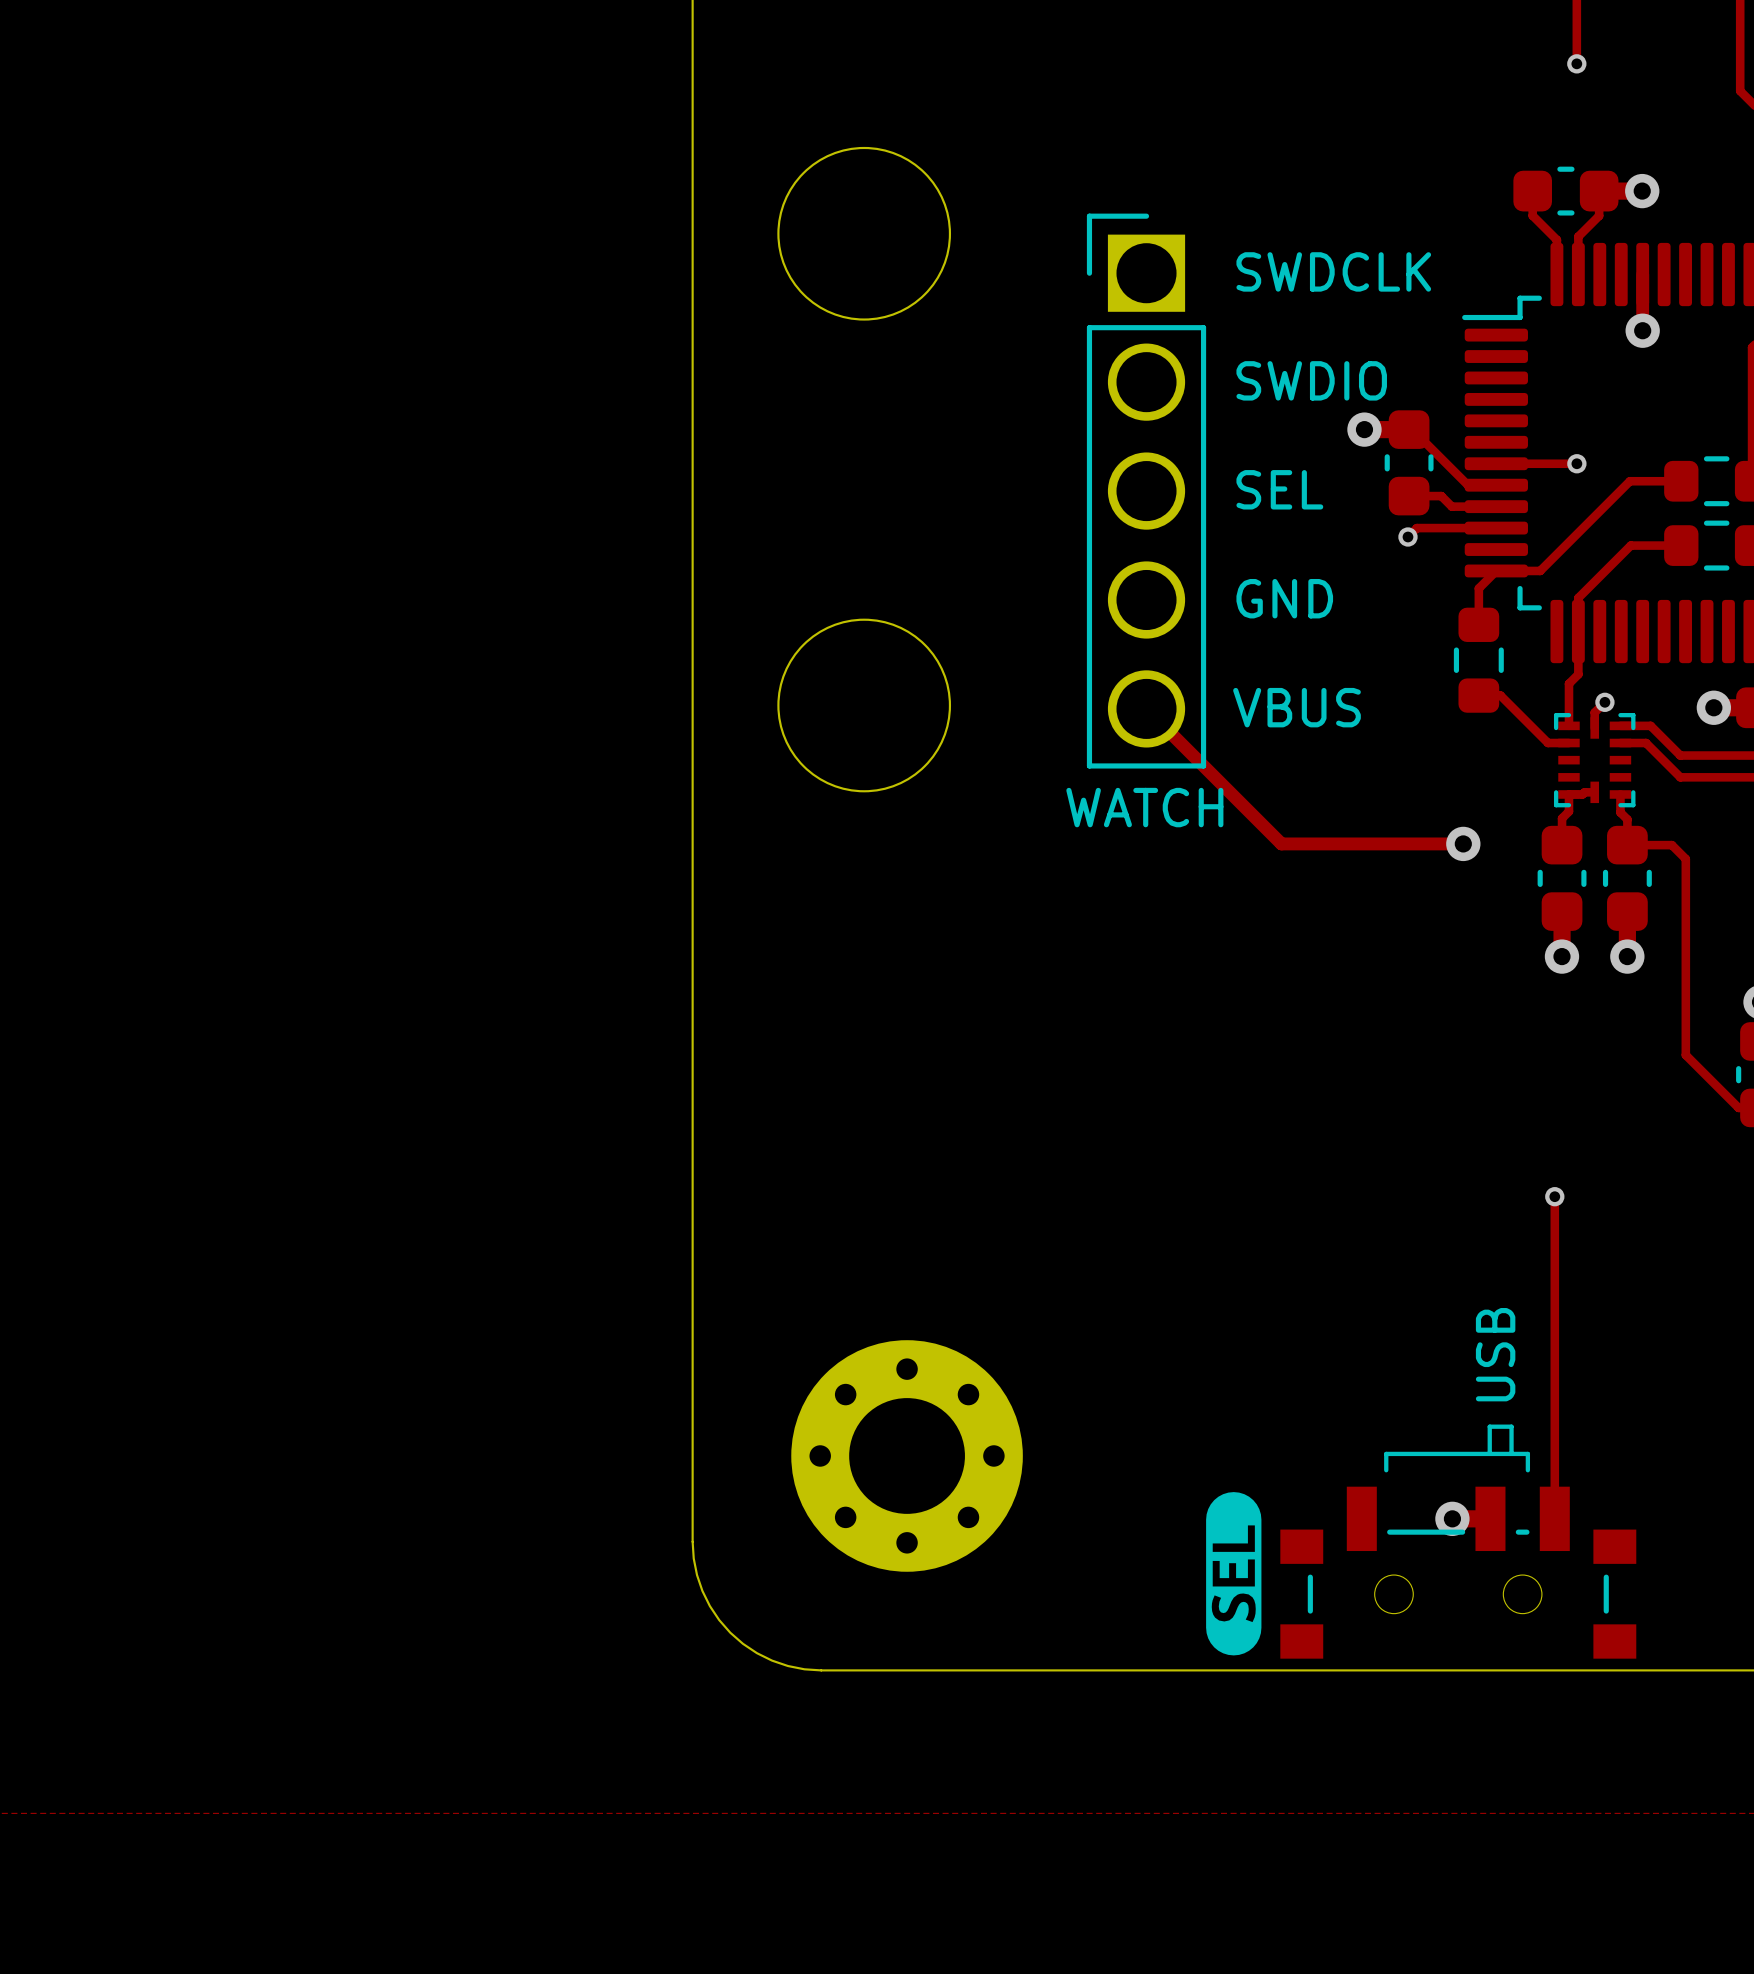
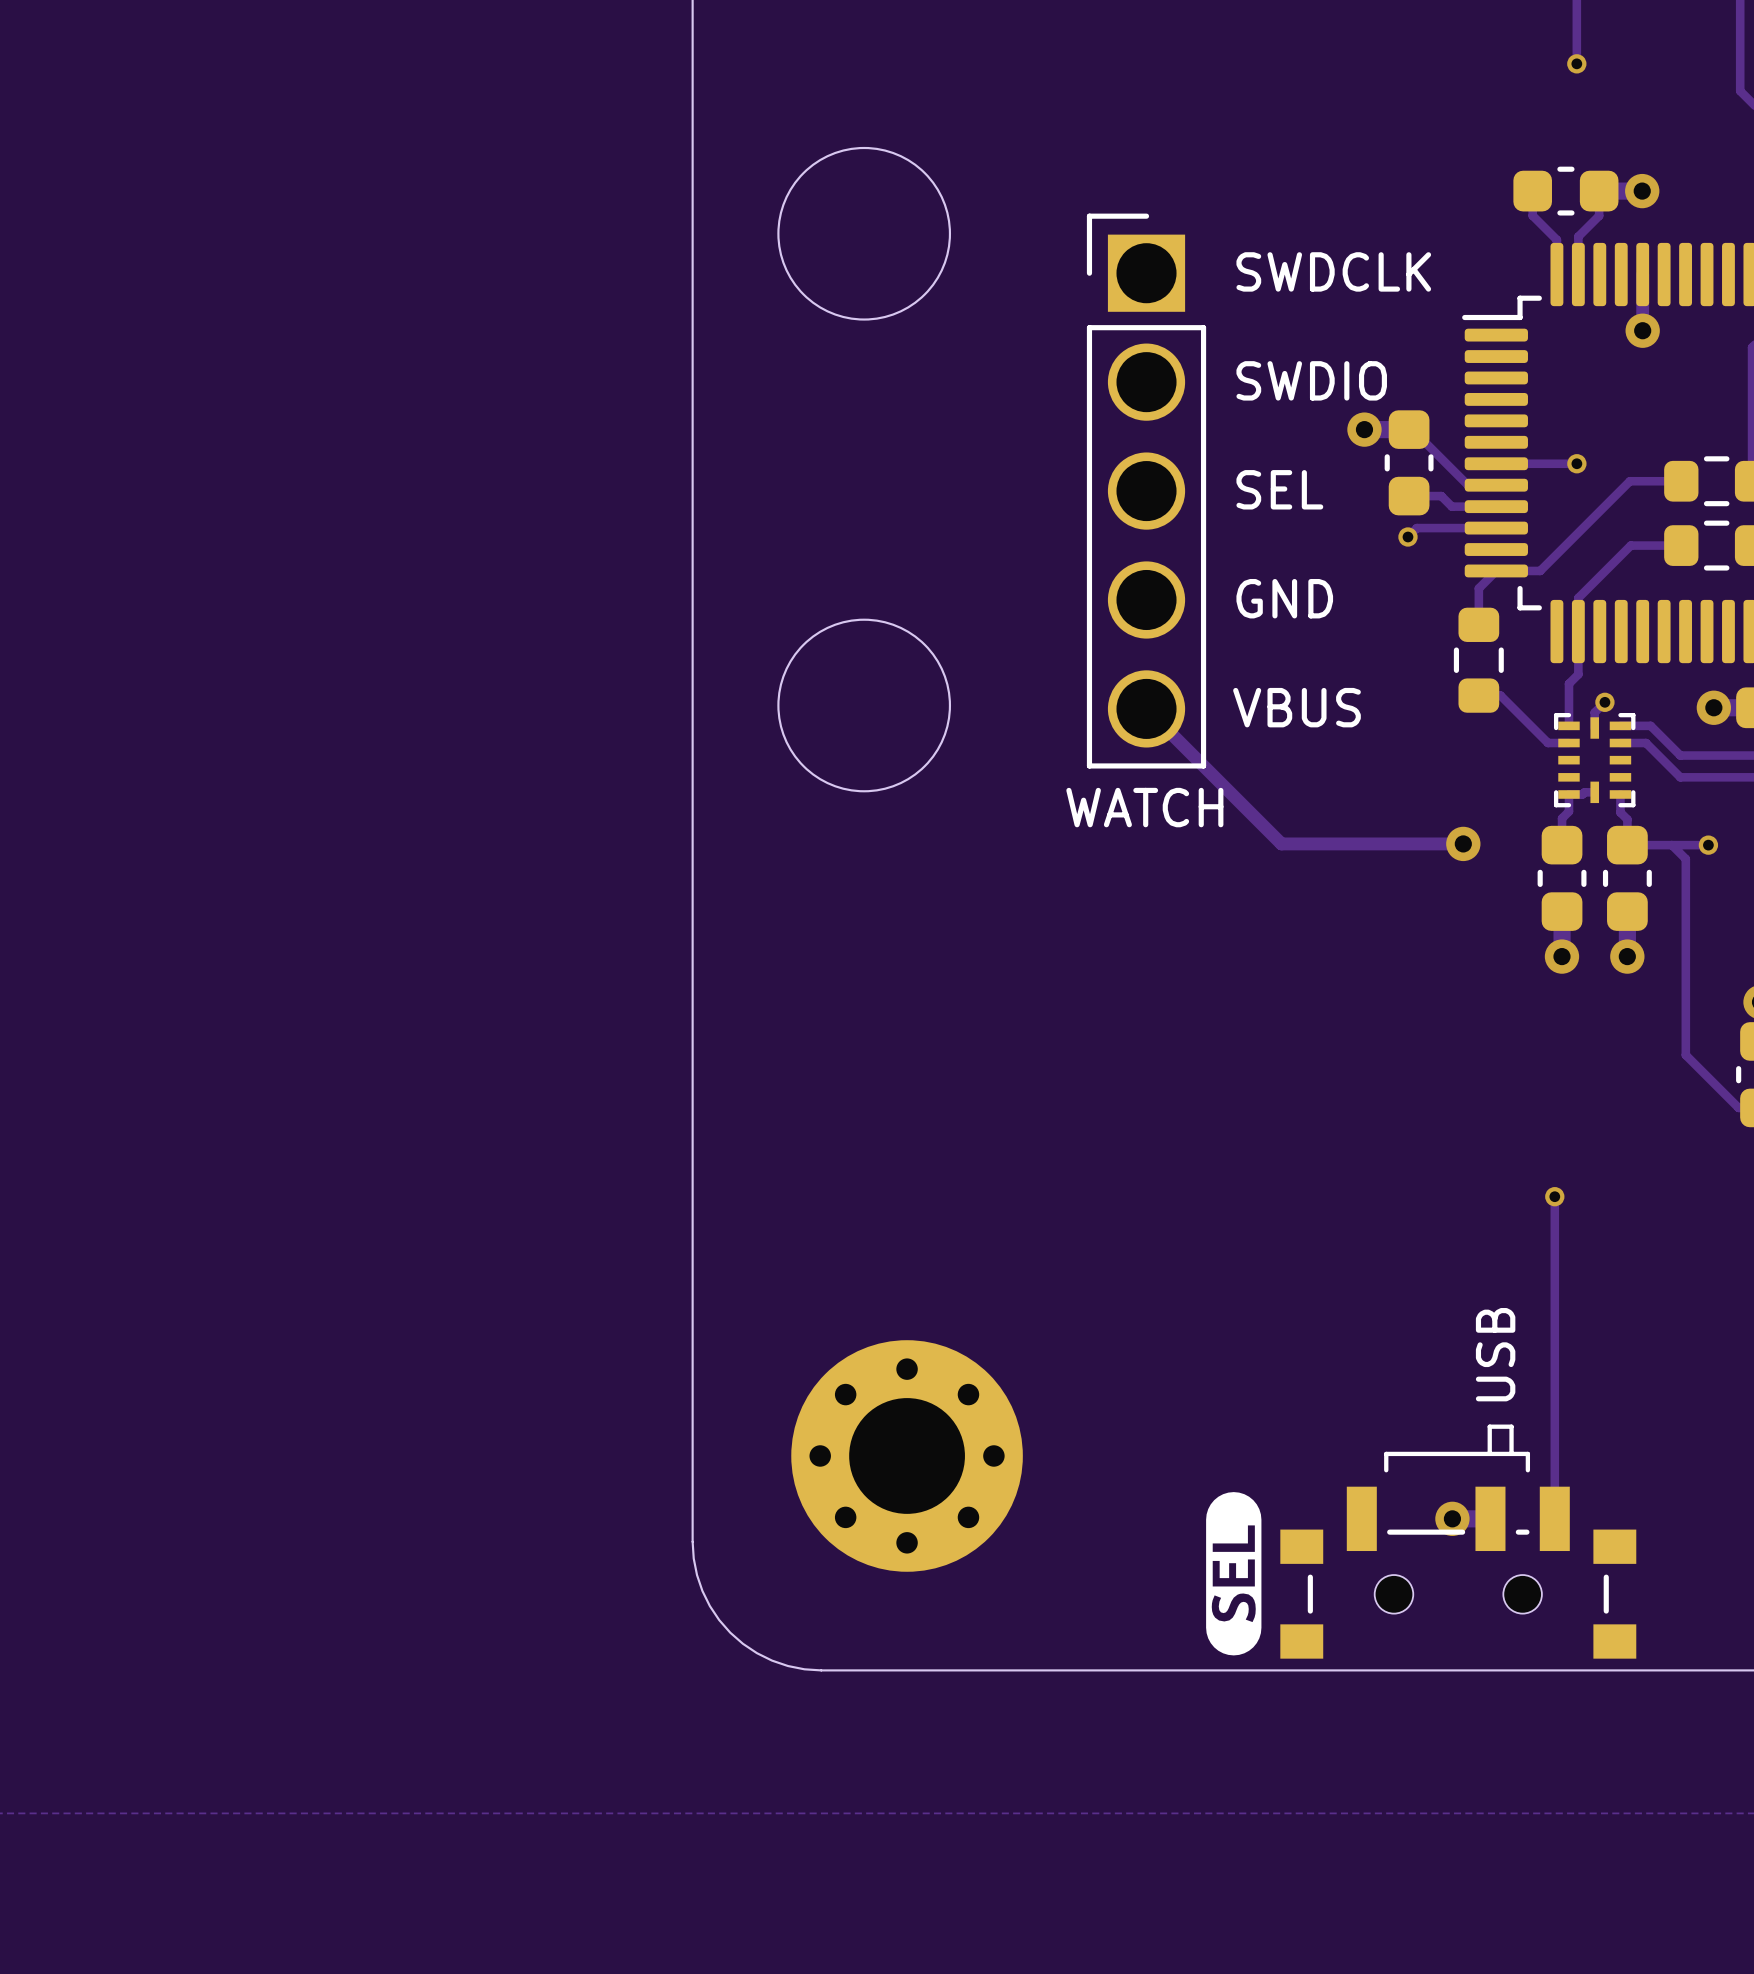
track: none -> (1671, 845) (1708, 845)
via: none -> (1708, 845)

